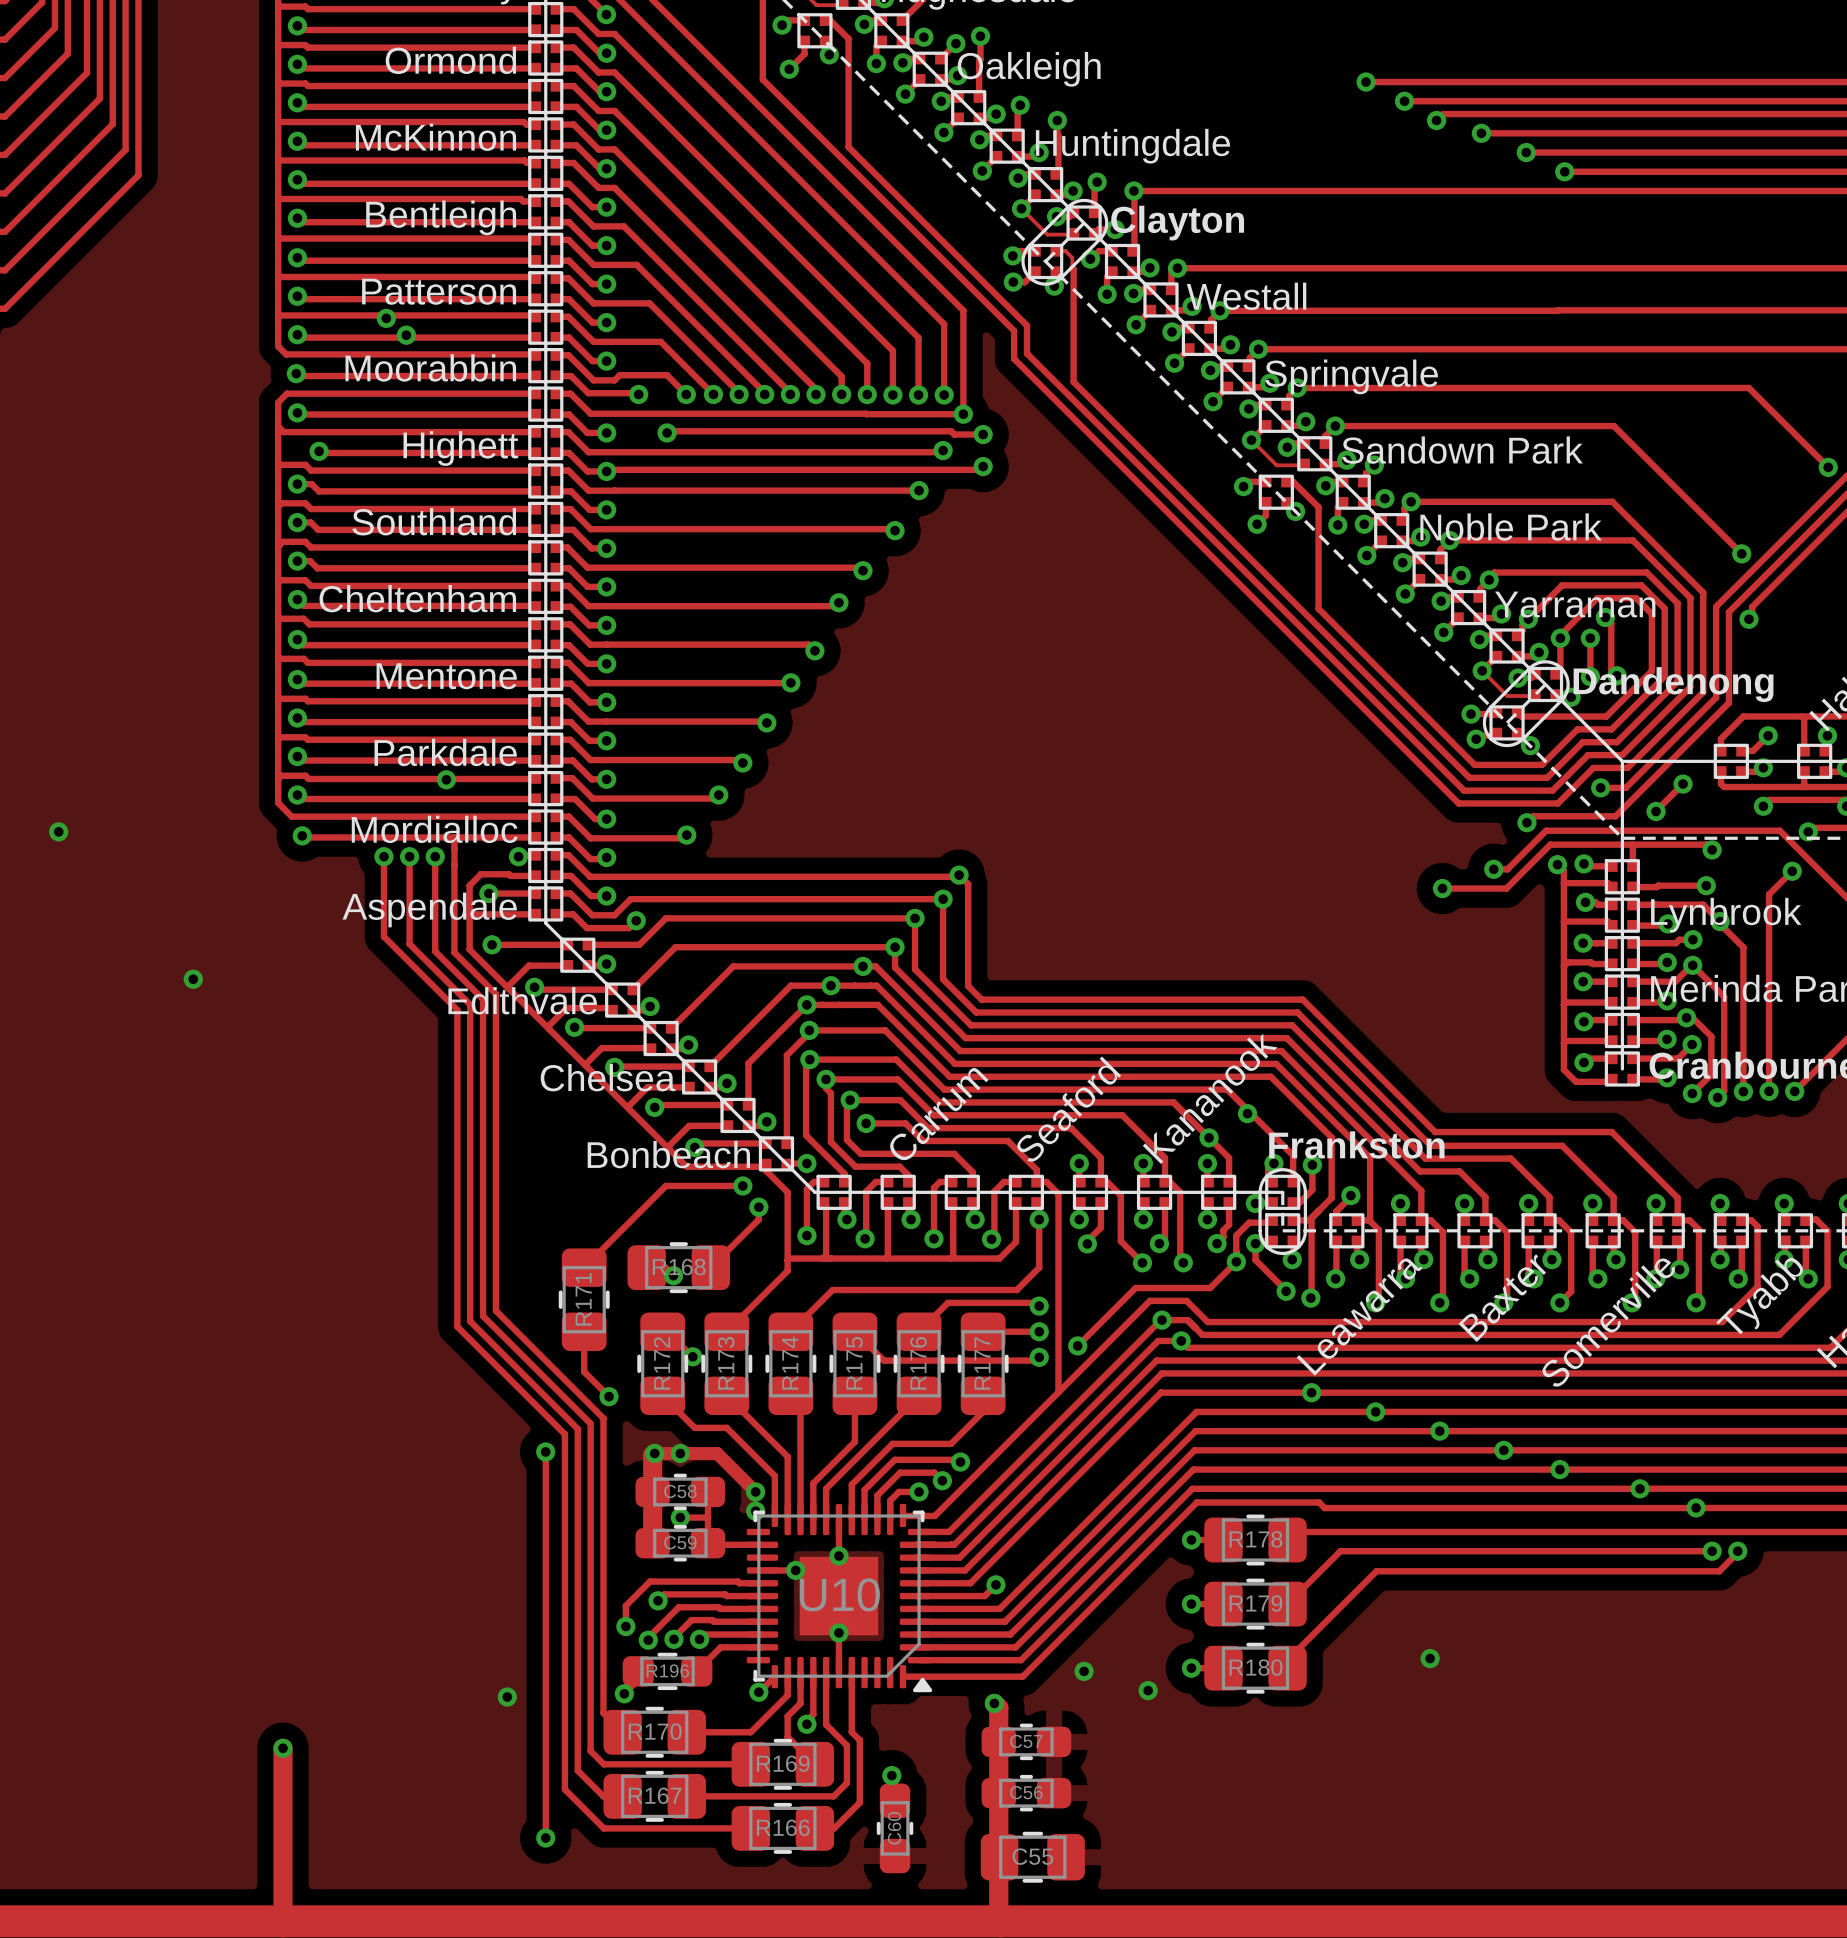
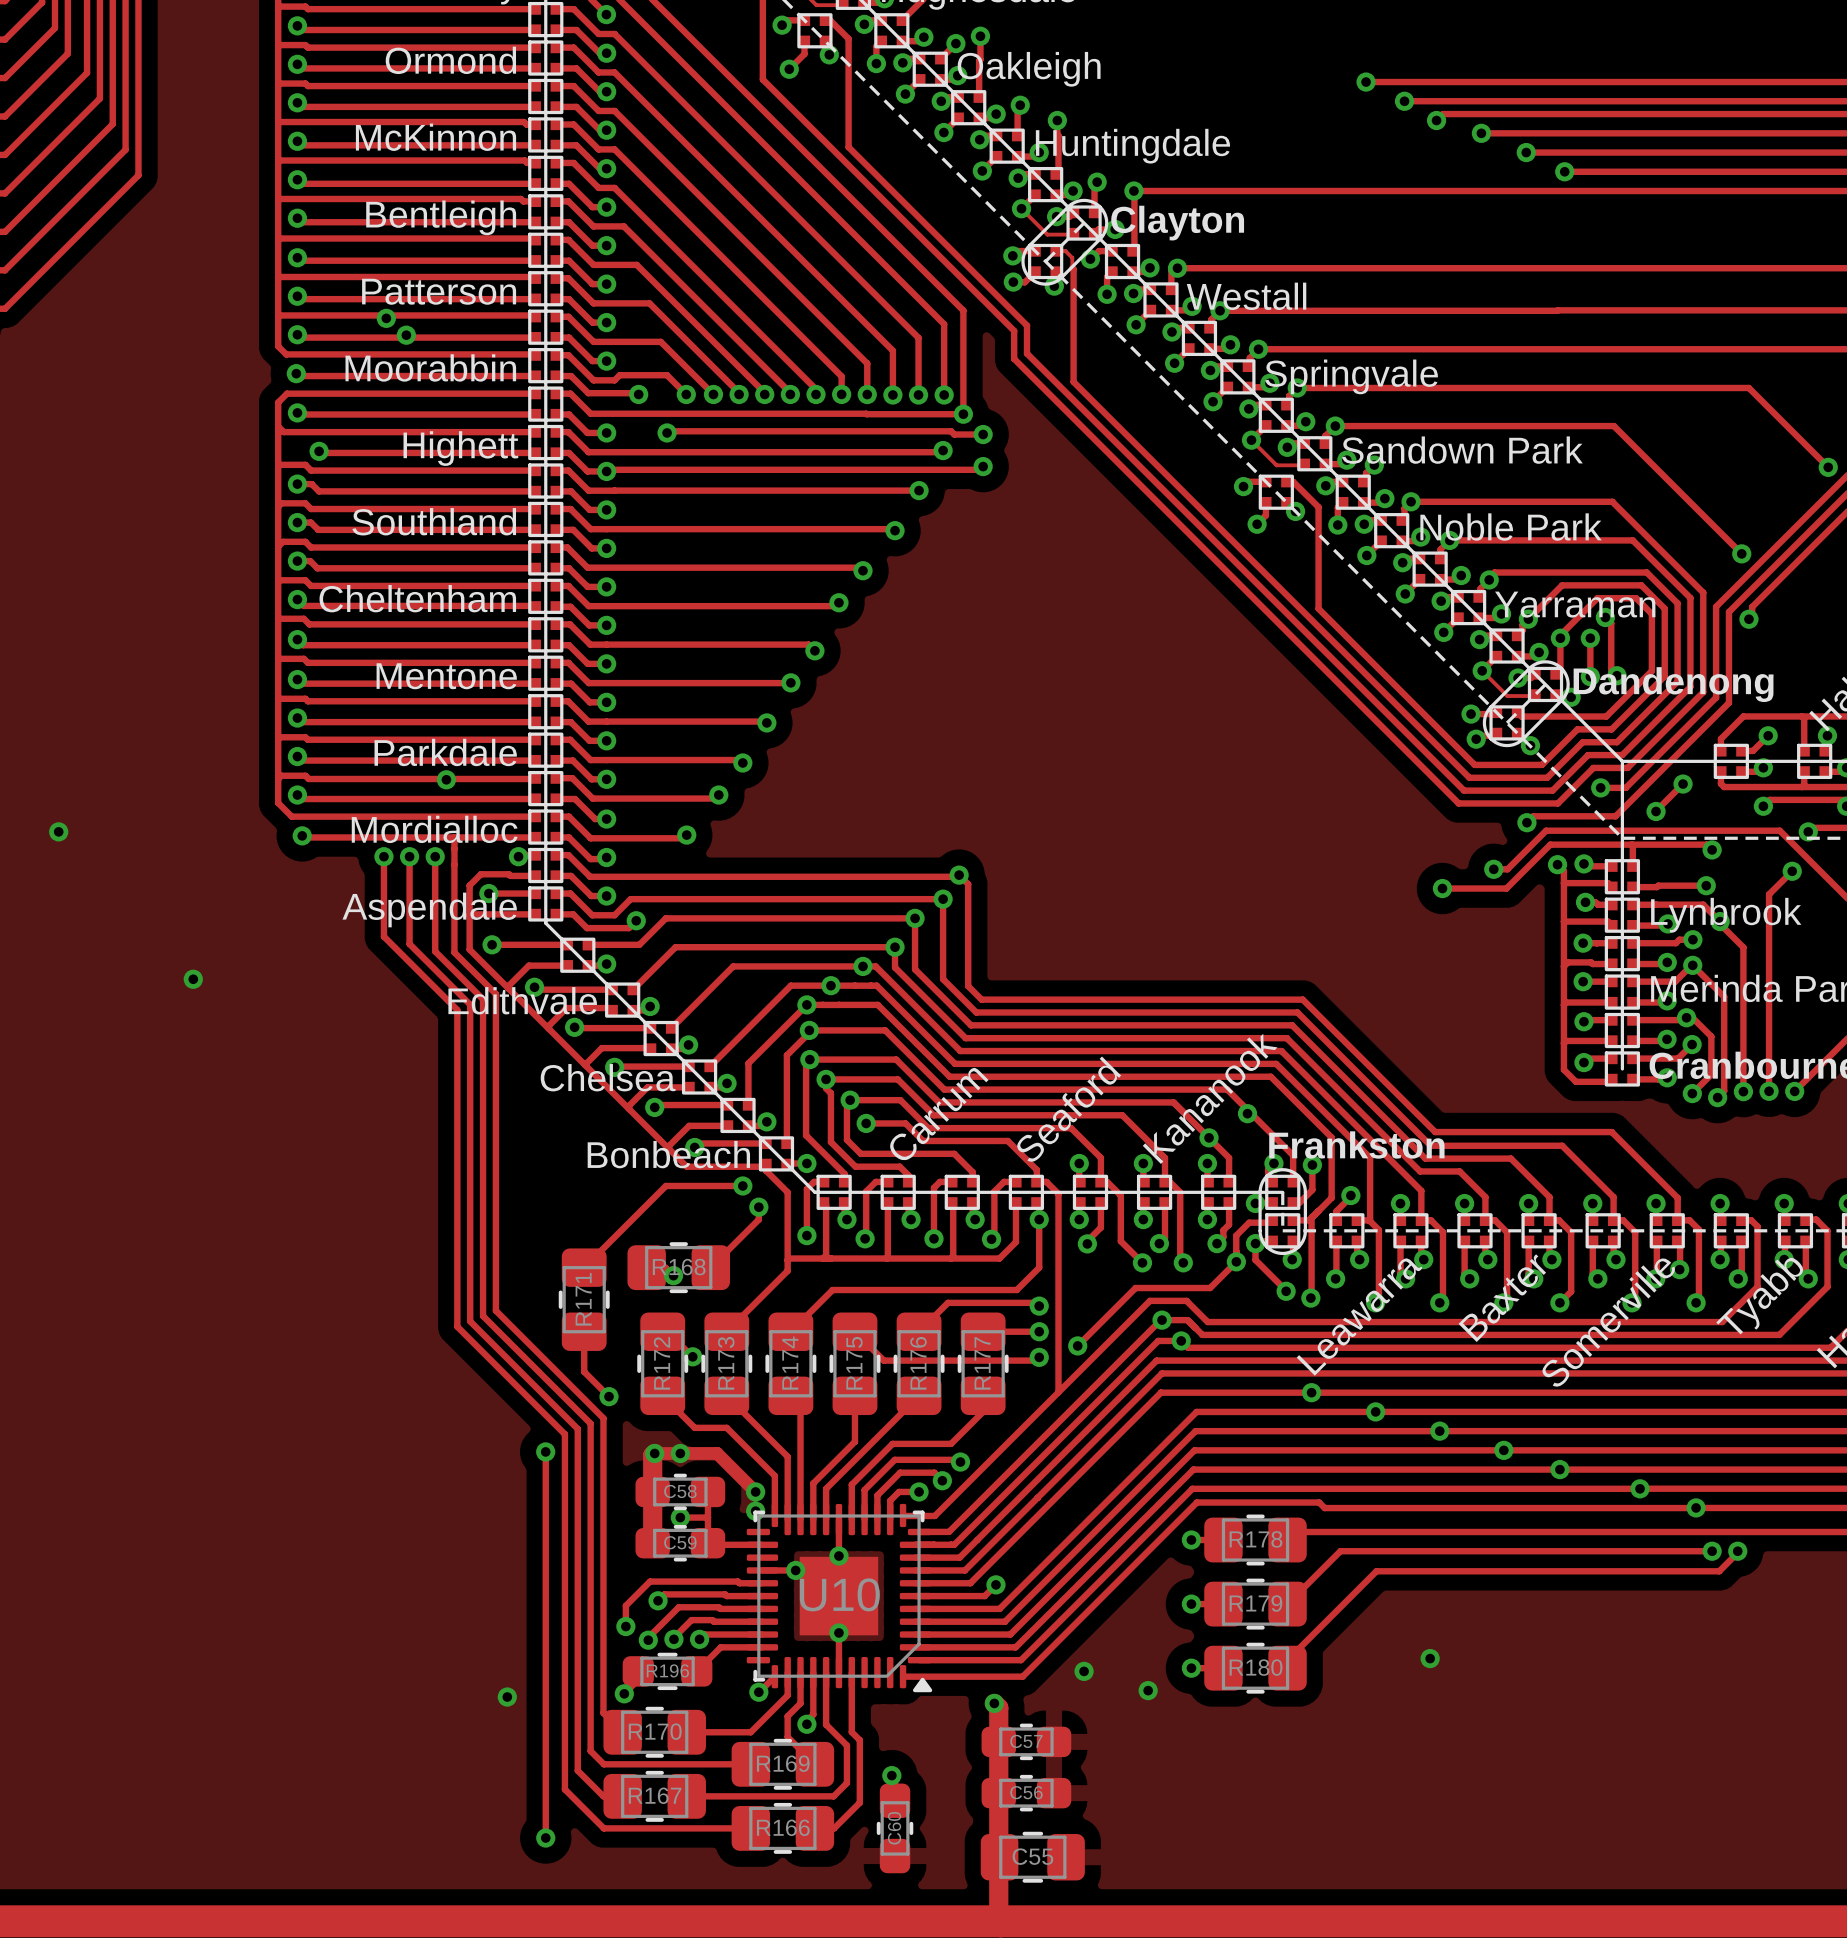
track: (283, 1748) (283, 1921) -> none
via: (283, 1748) -> none

